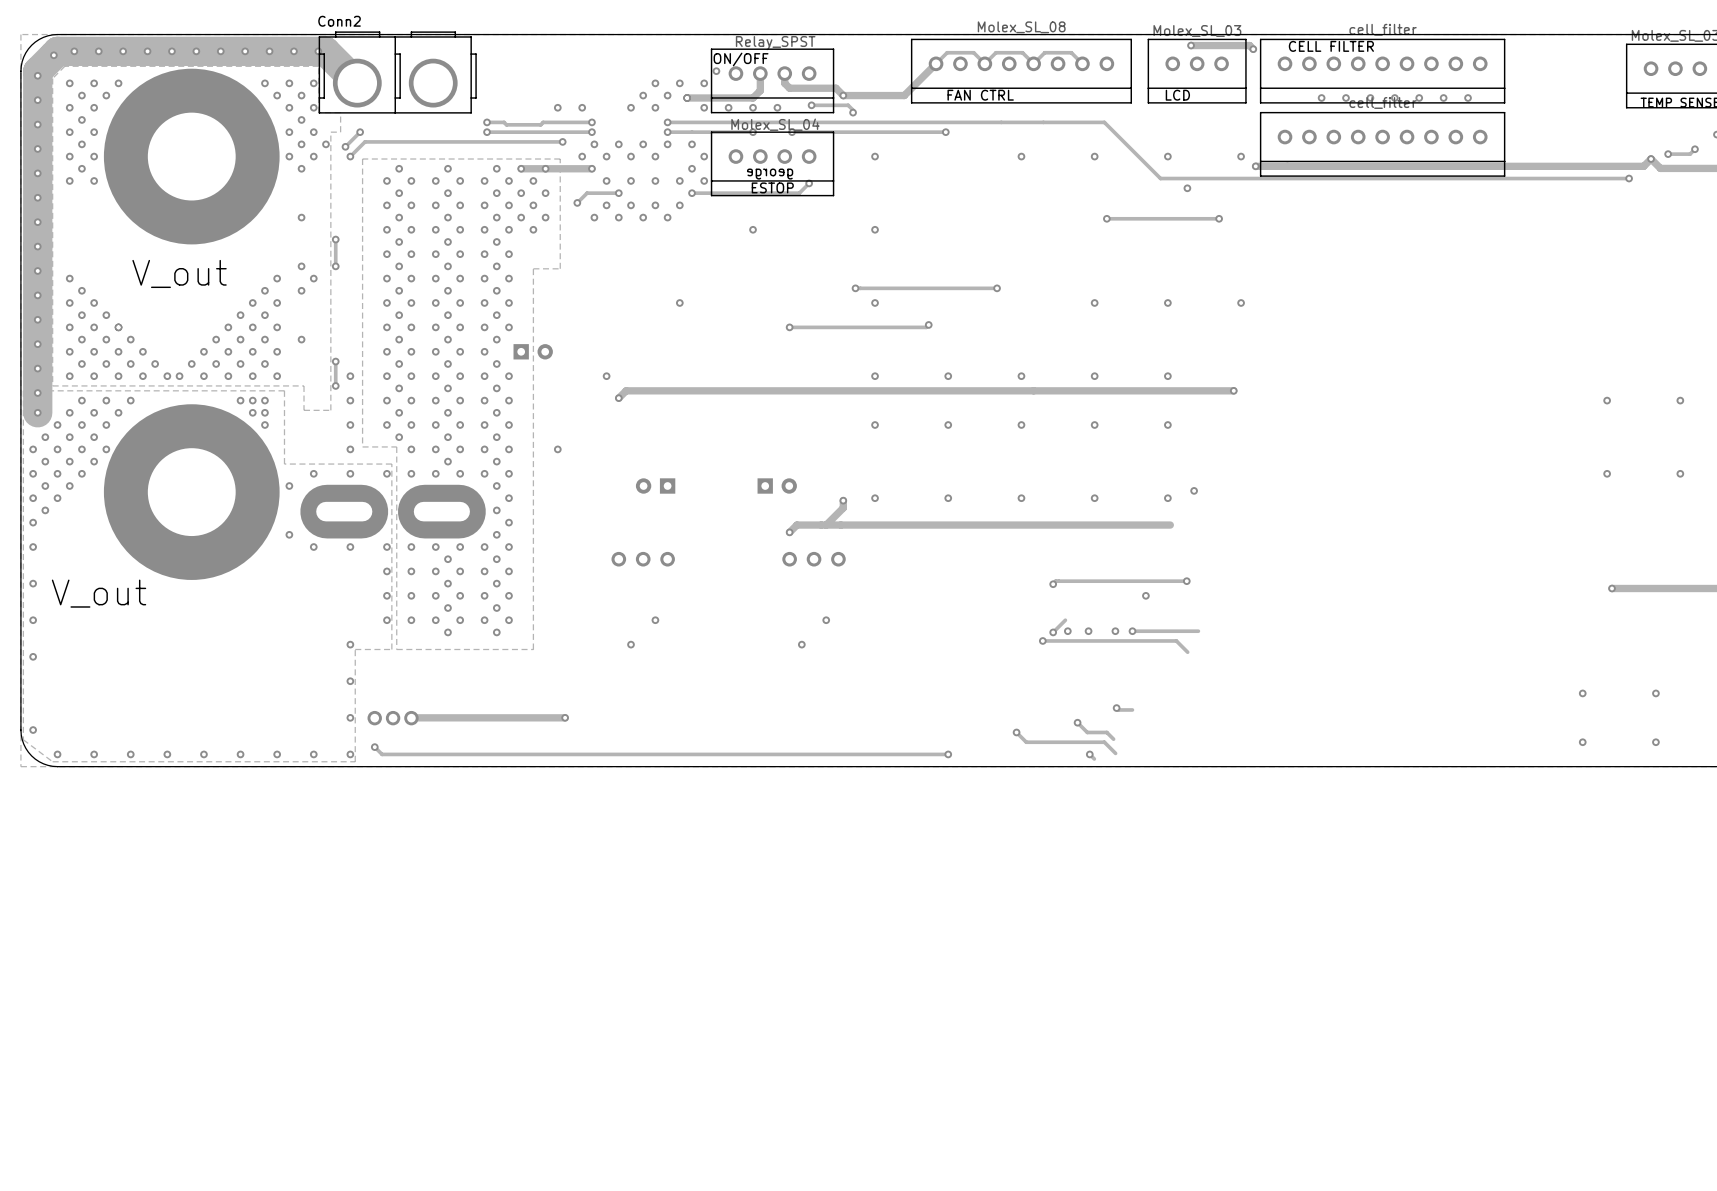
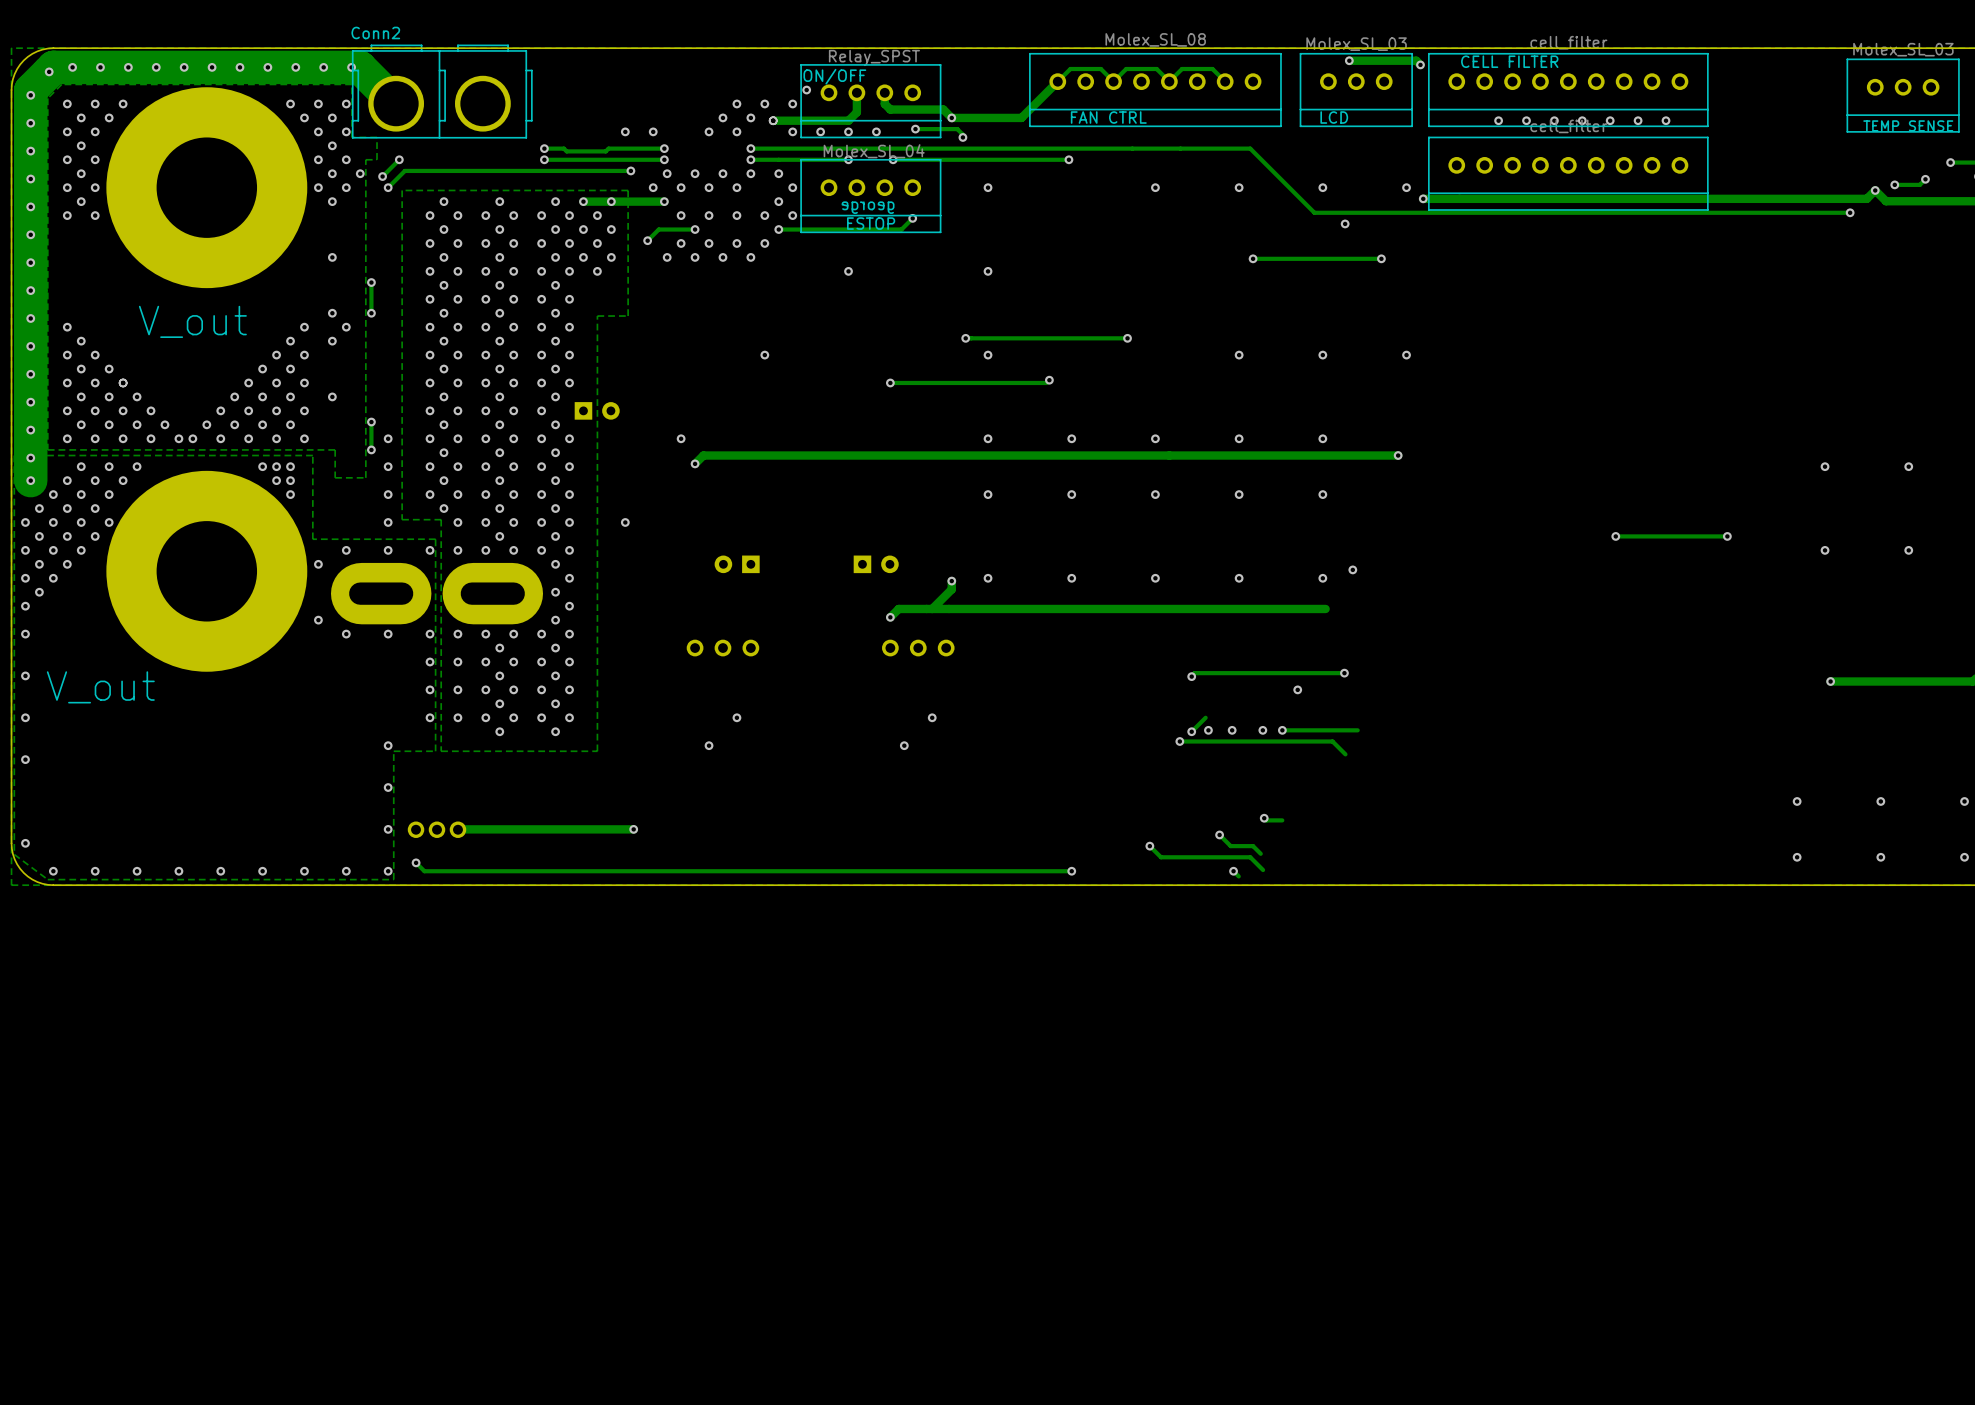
via: none -> (1615, 536)
track: none -> (1727, 536) (1615, 536)
via: none -> (1727, 536)

